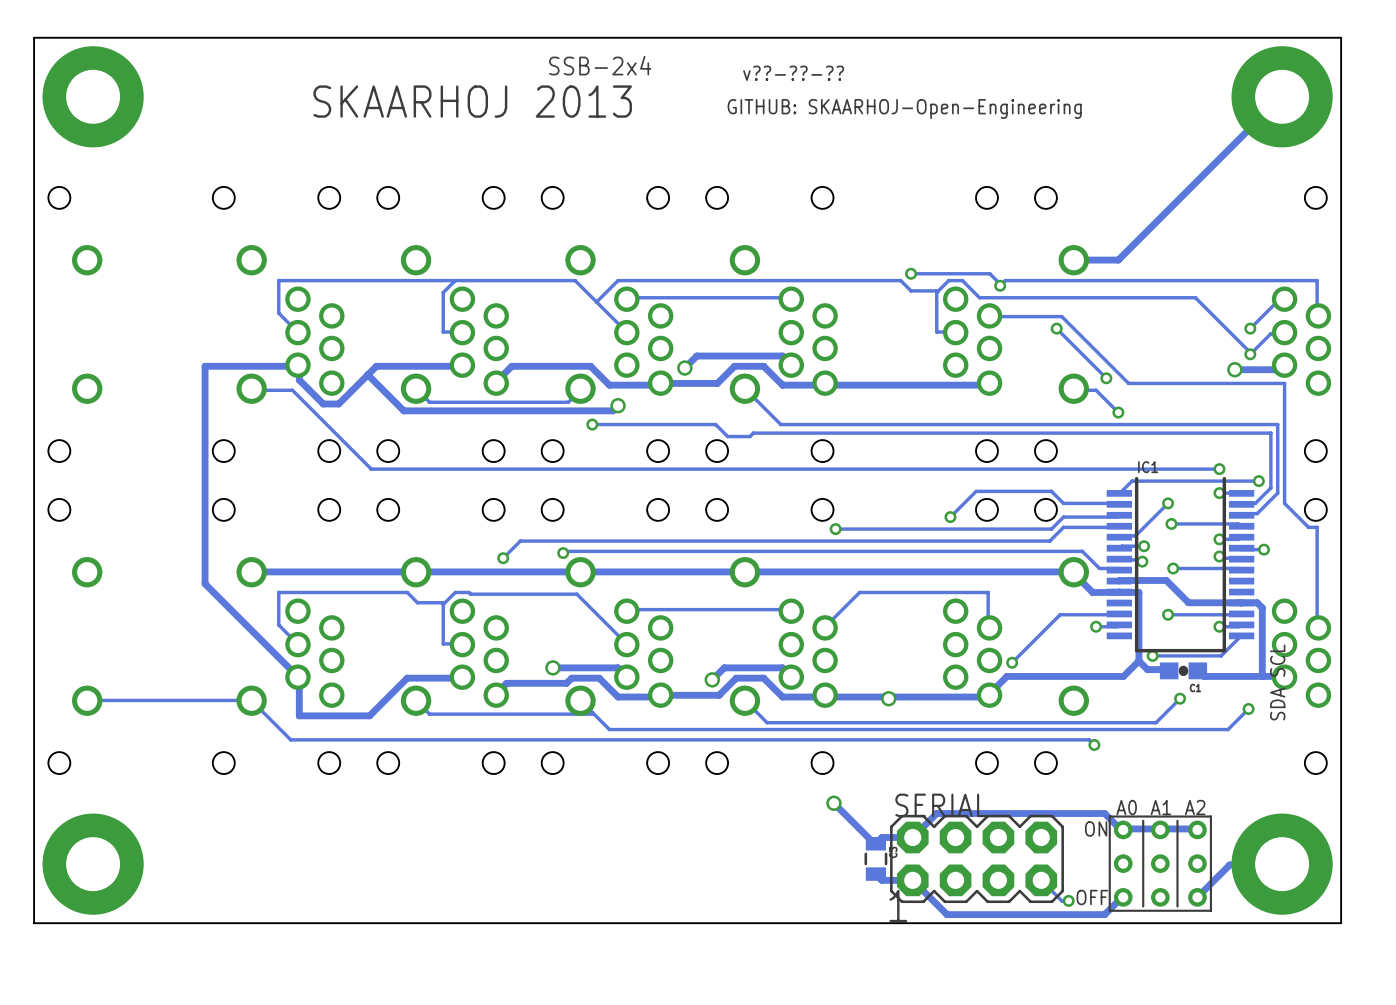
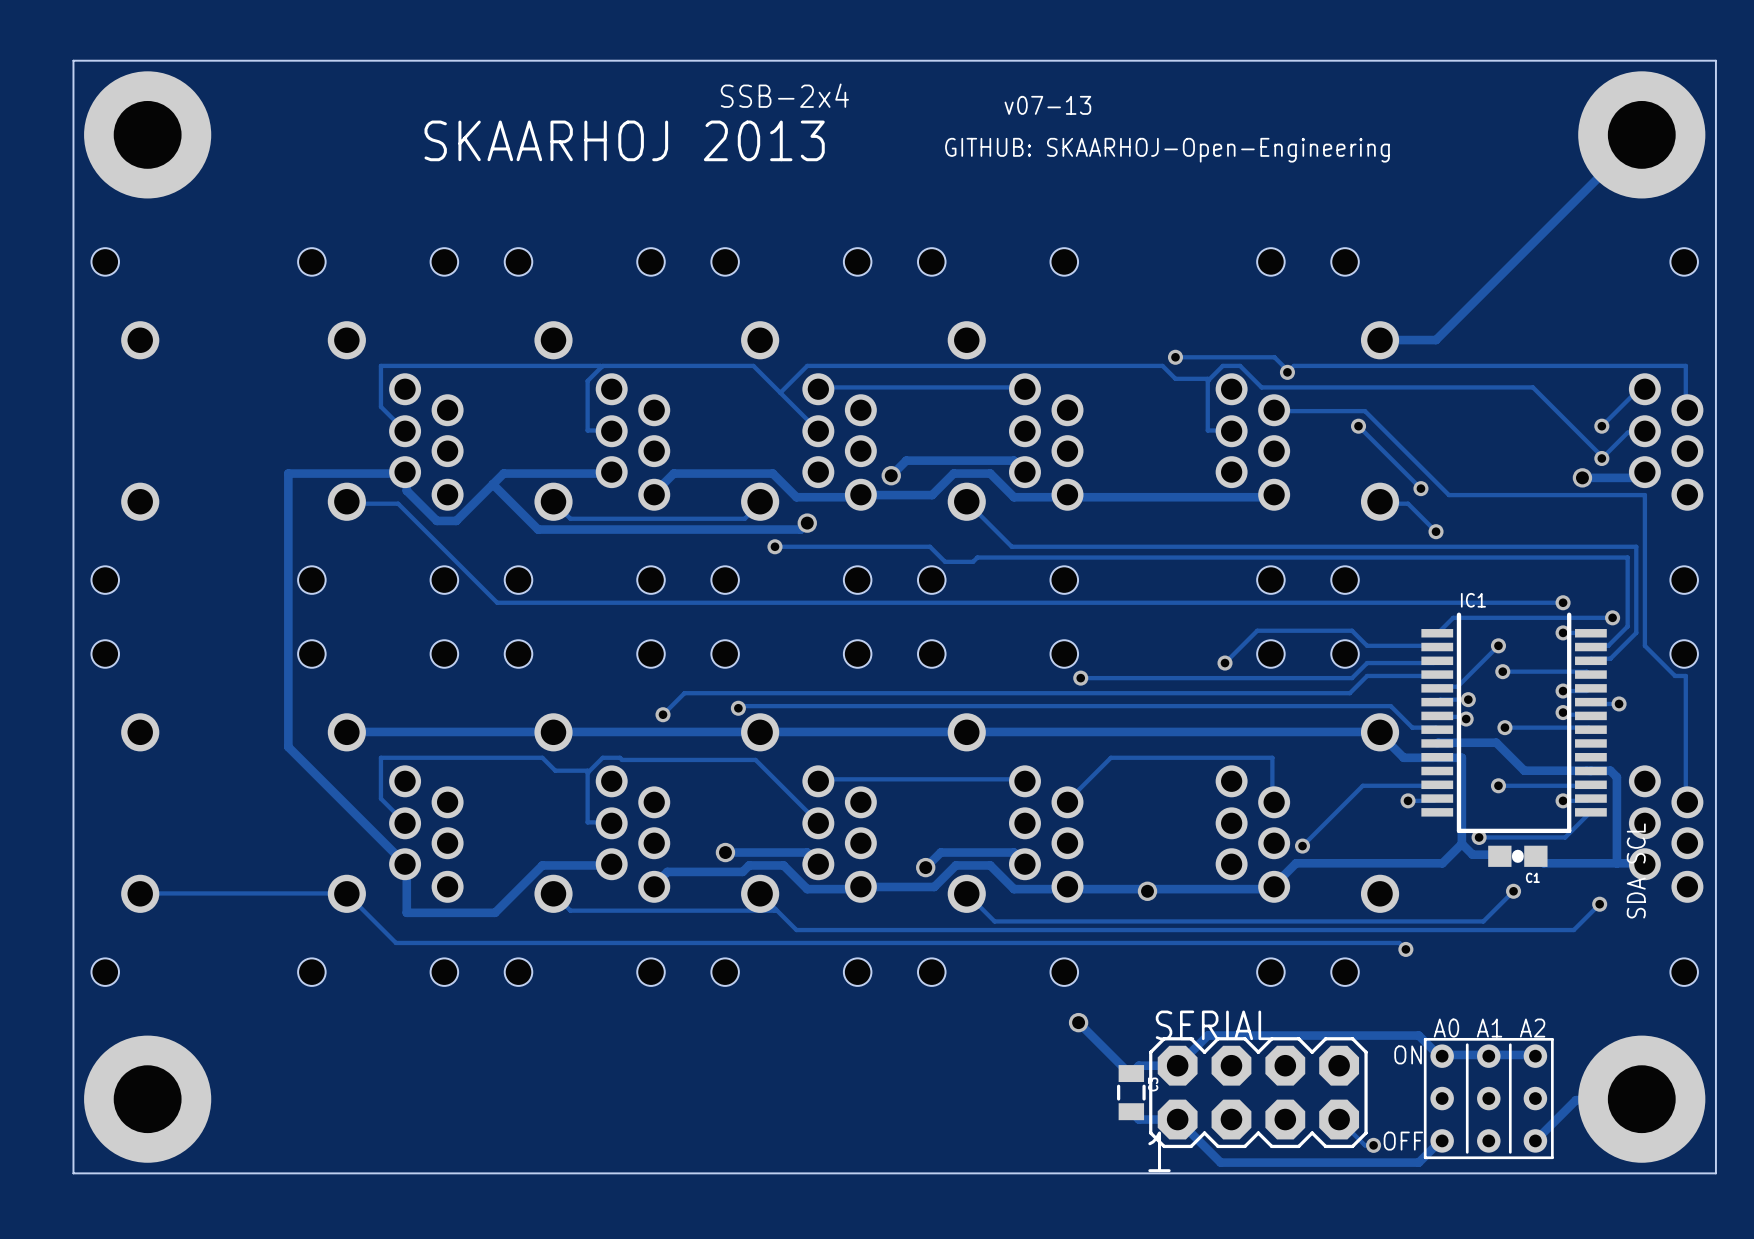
text: v??-??-?? (793, 73) -> v07-13 (1047, 105)

